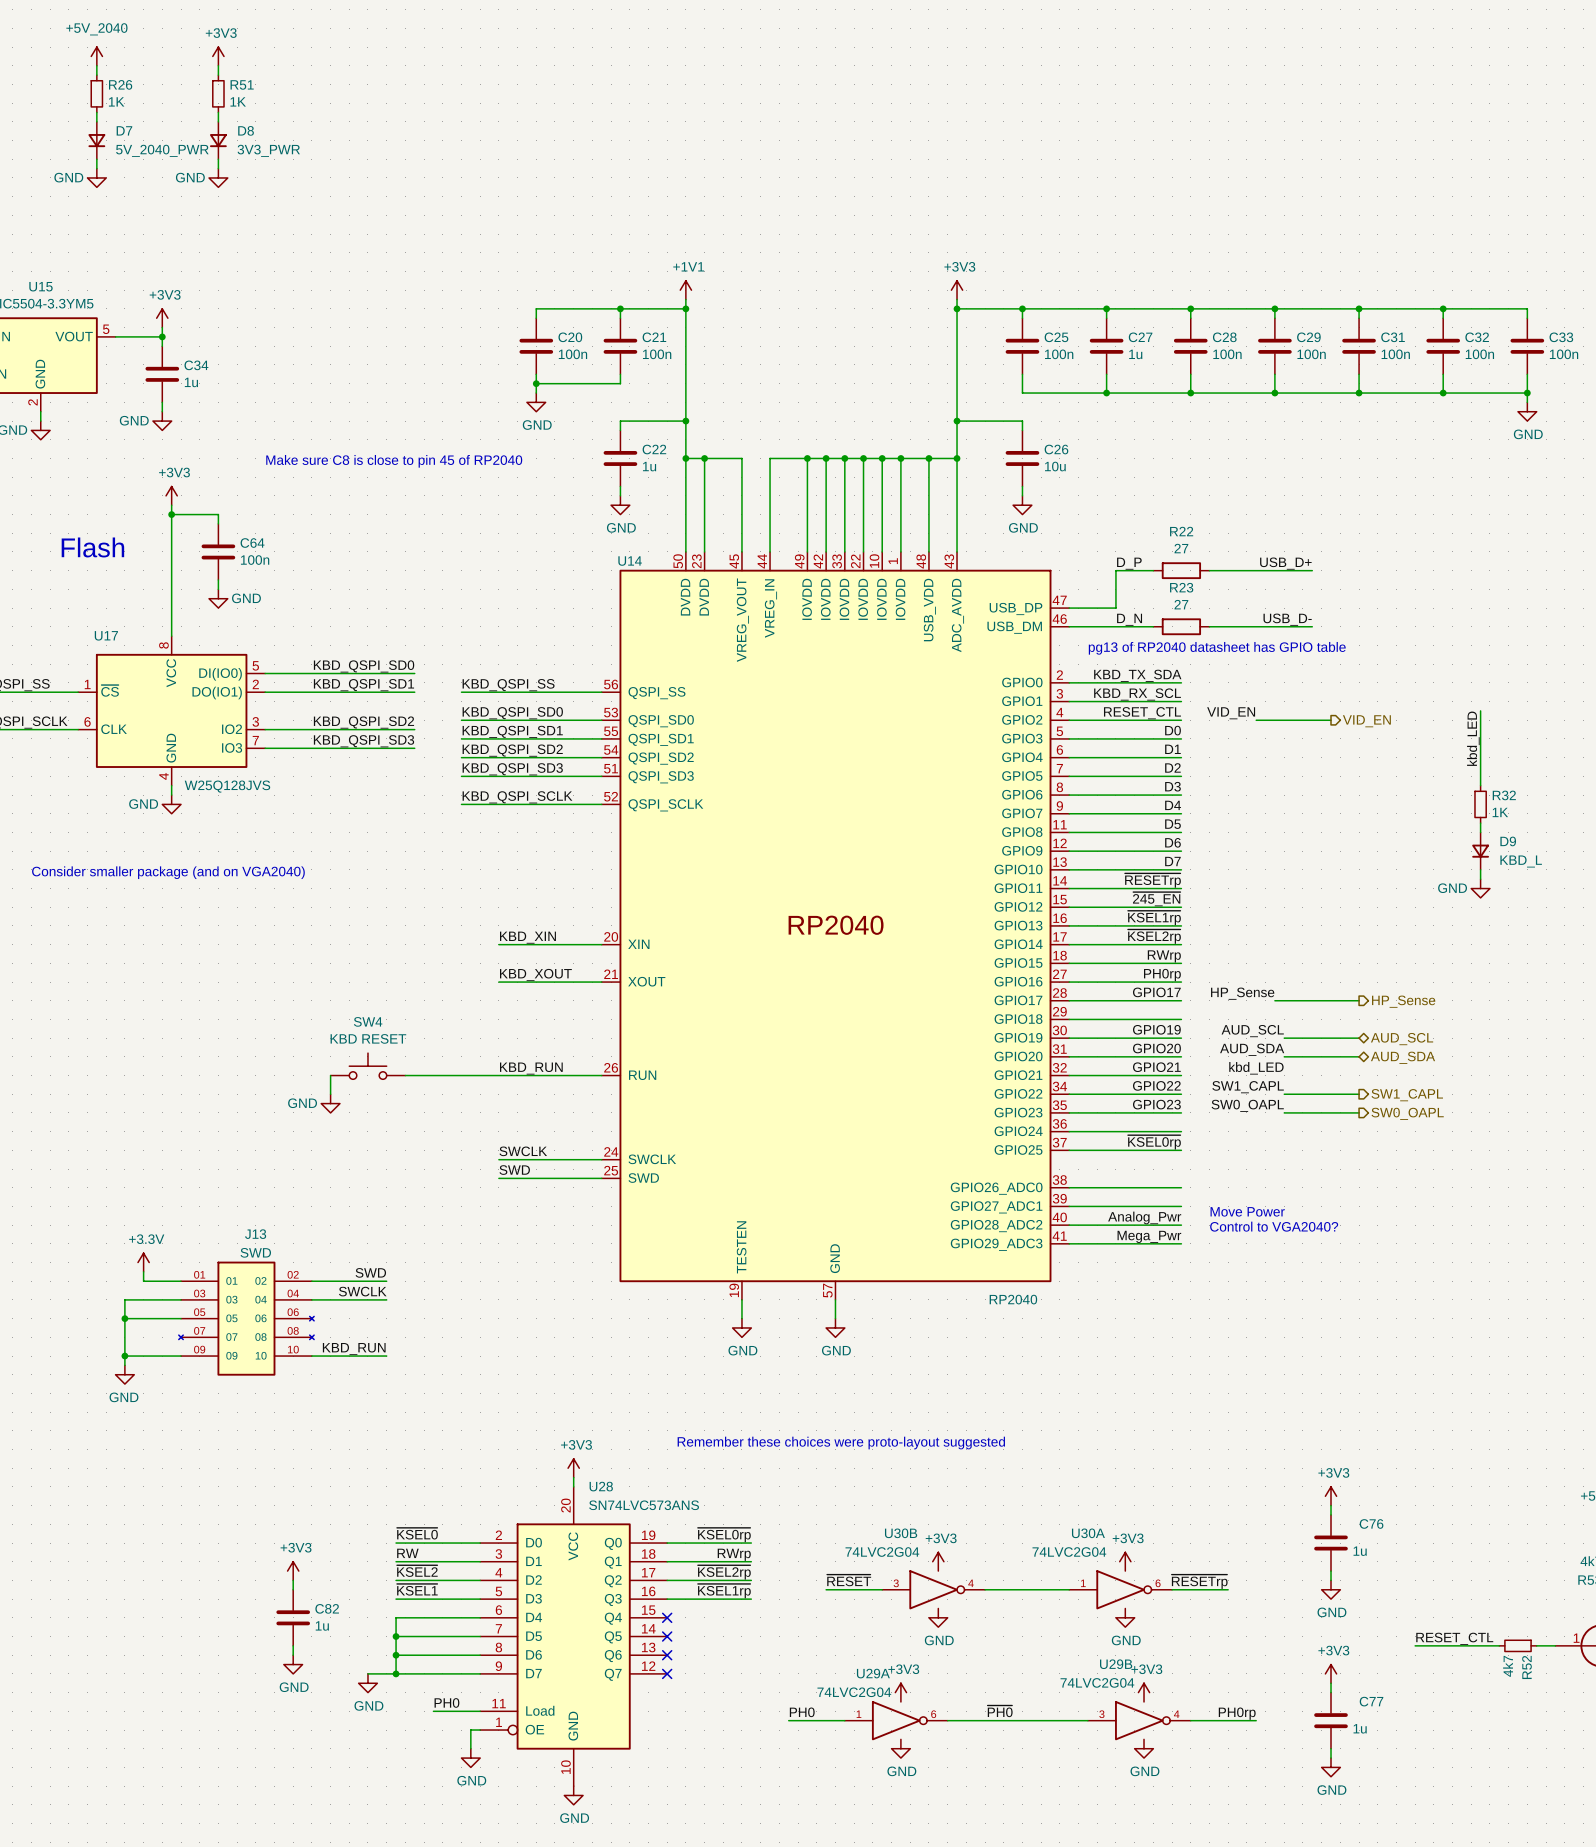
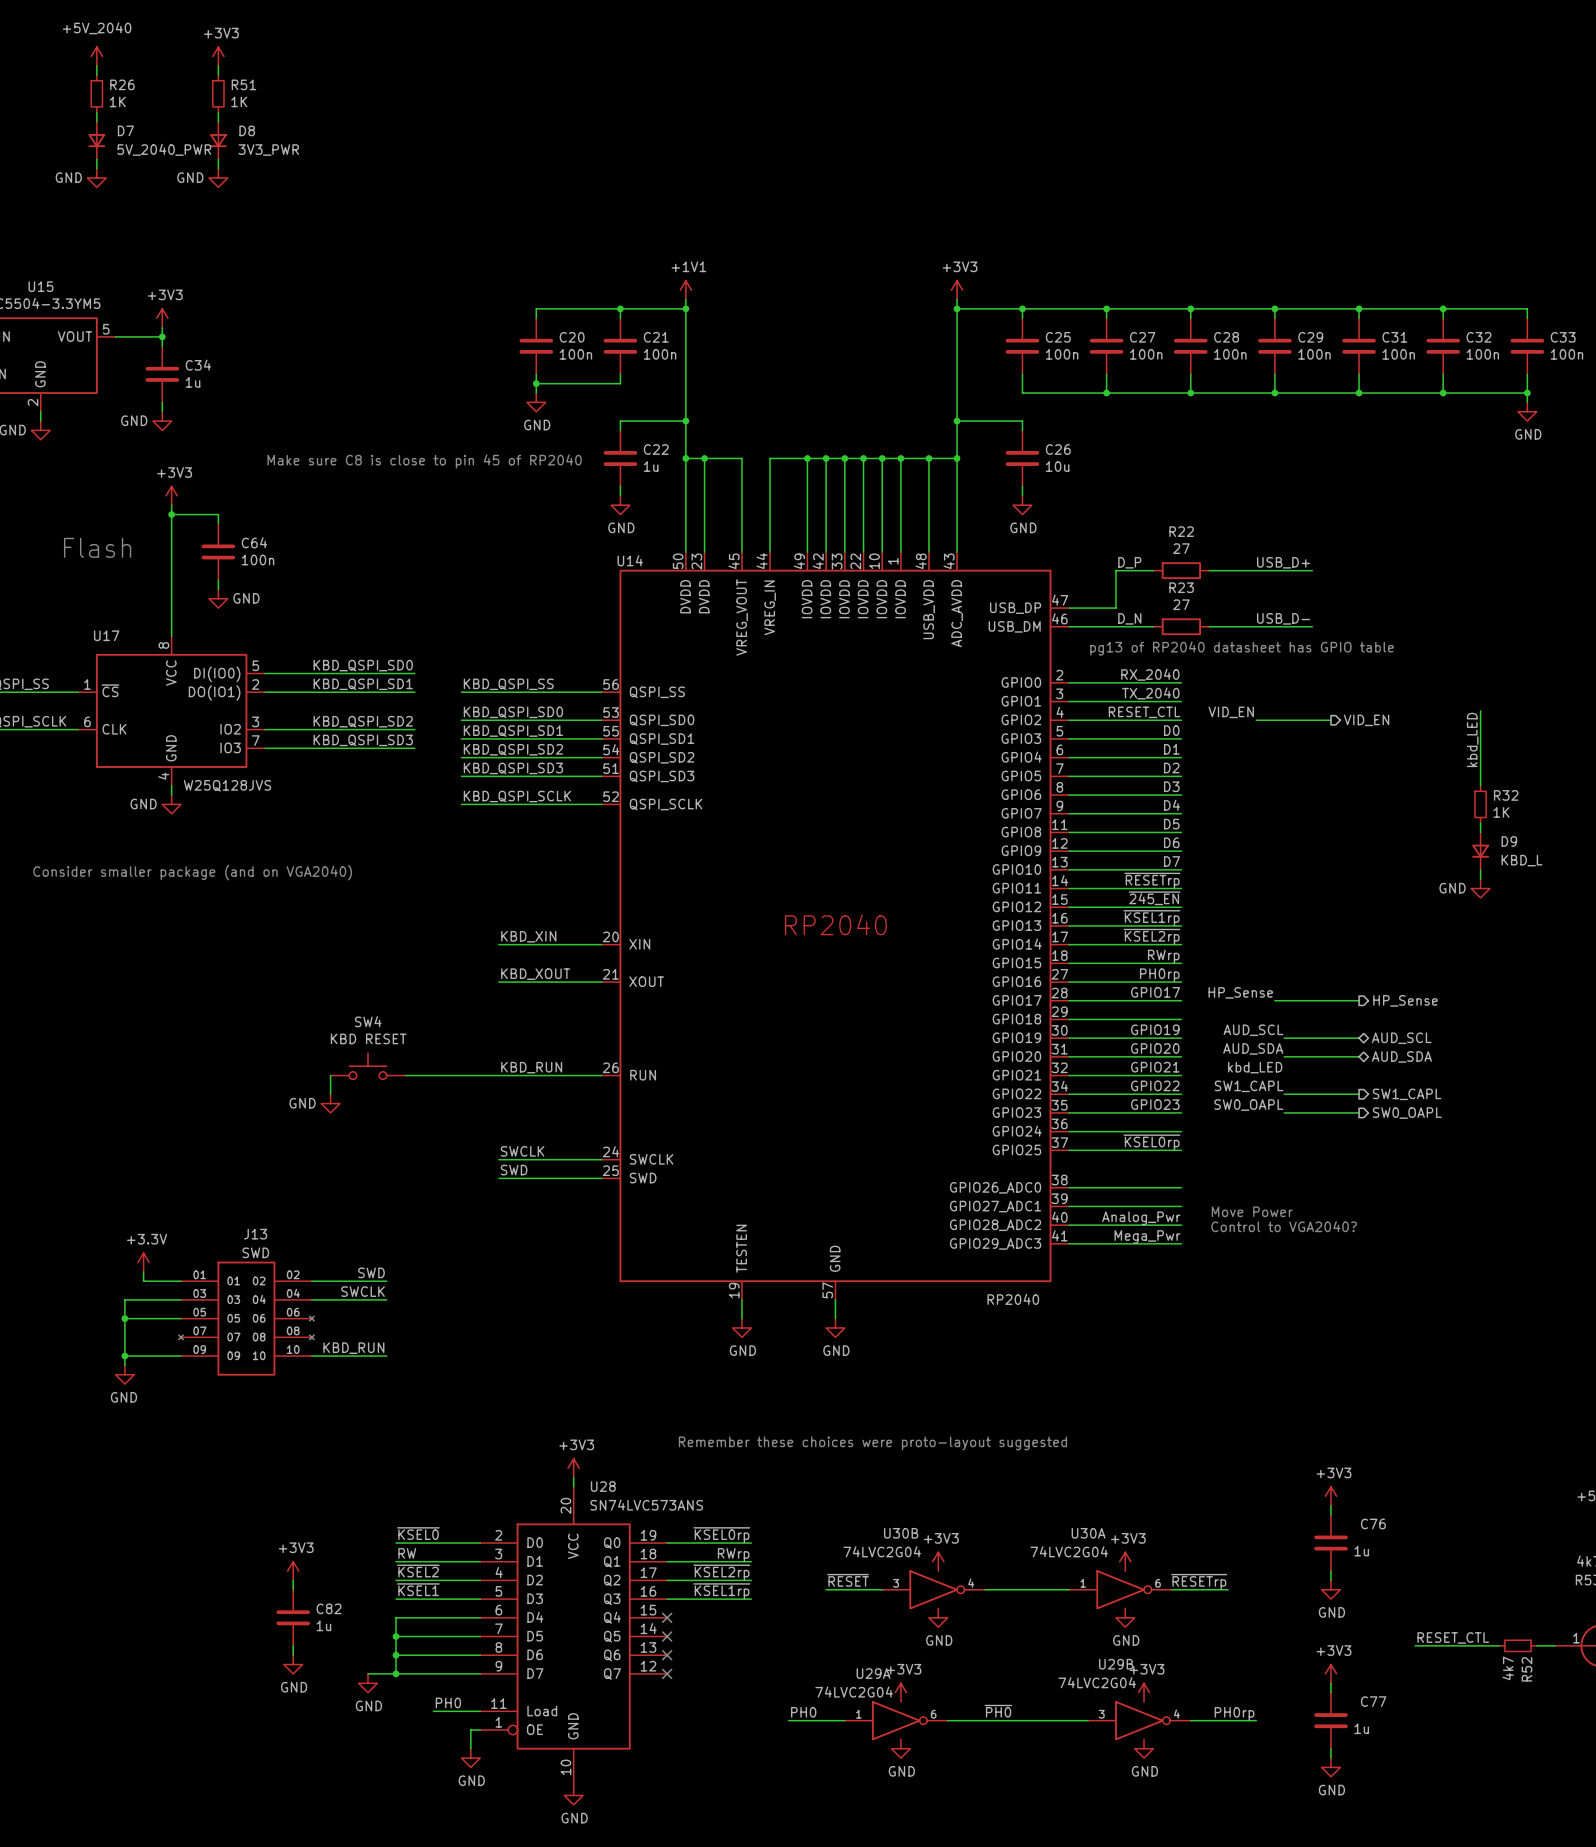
C27 value: 1u (1135, 354) -> 100n (1146, 354)
label: KBD_TX_SDA (1137, 675) -> RX_2040 (1150, 674)
label: KBD_RX_SCL (1137, 694) -> TX_2040 (1150, 693)

